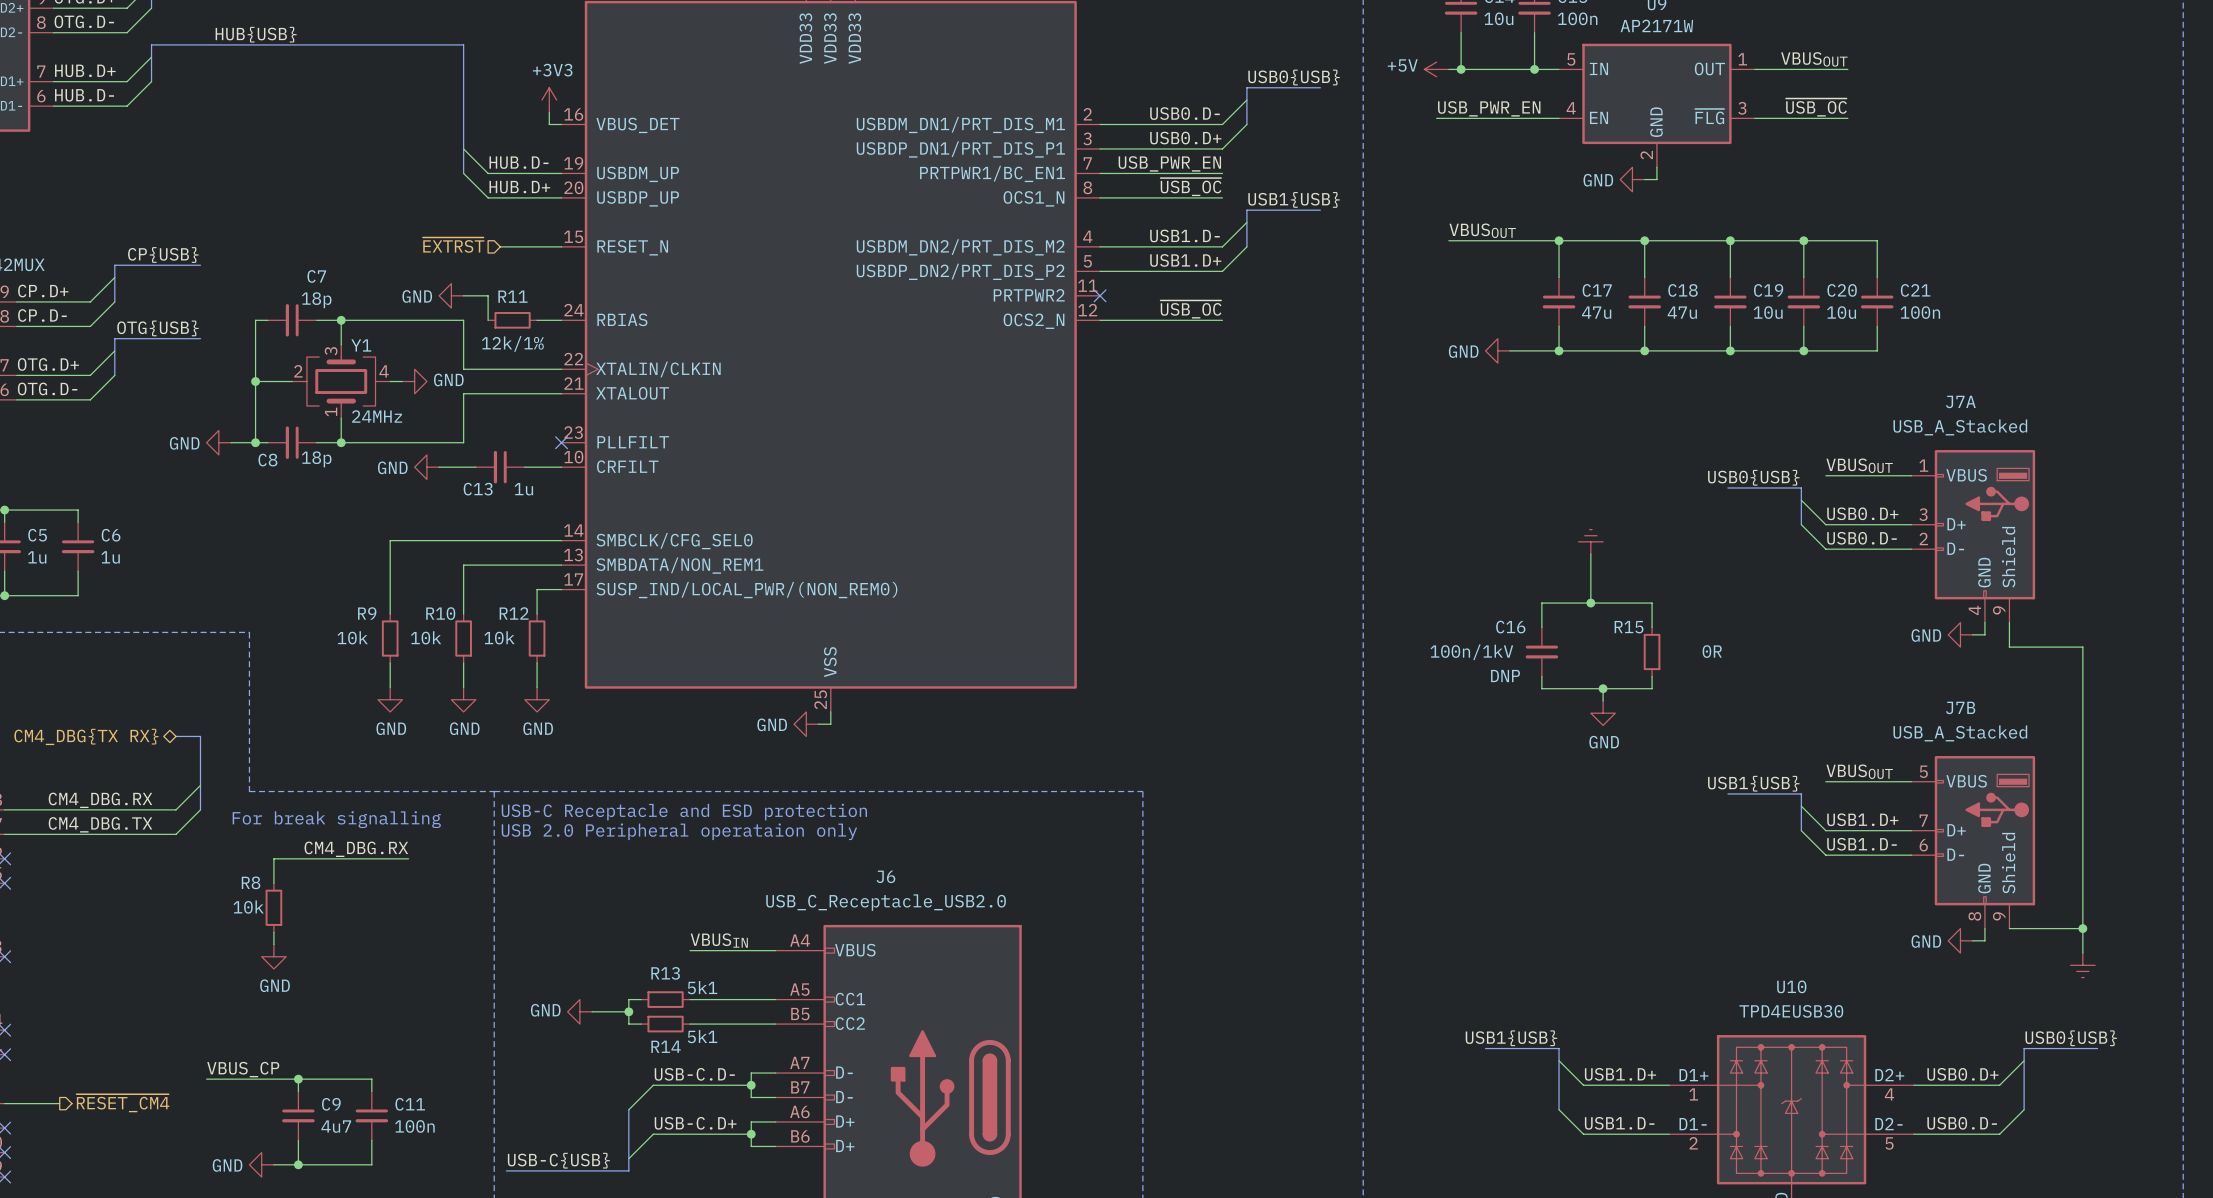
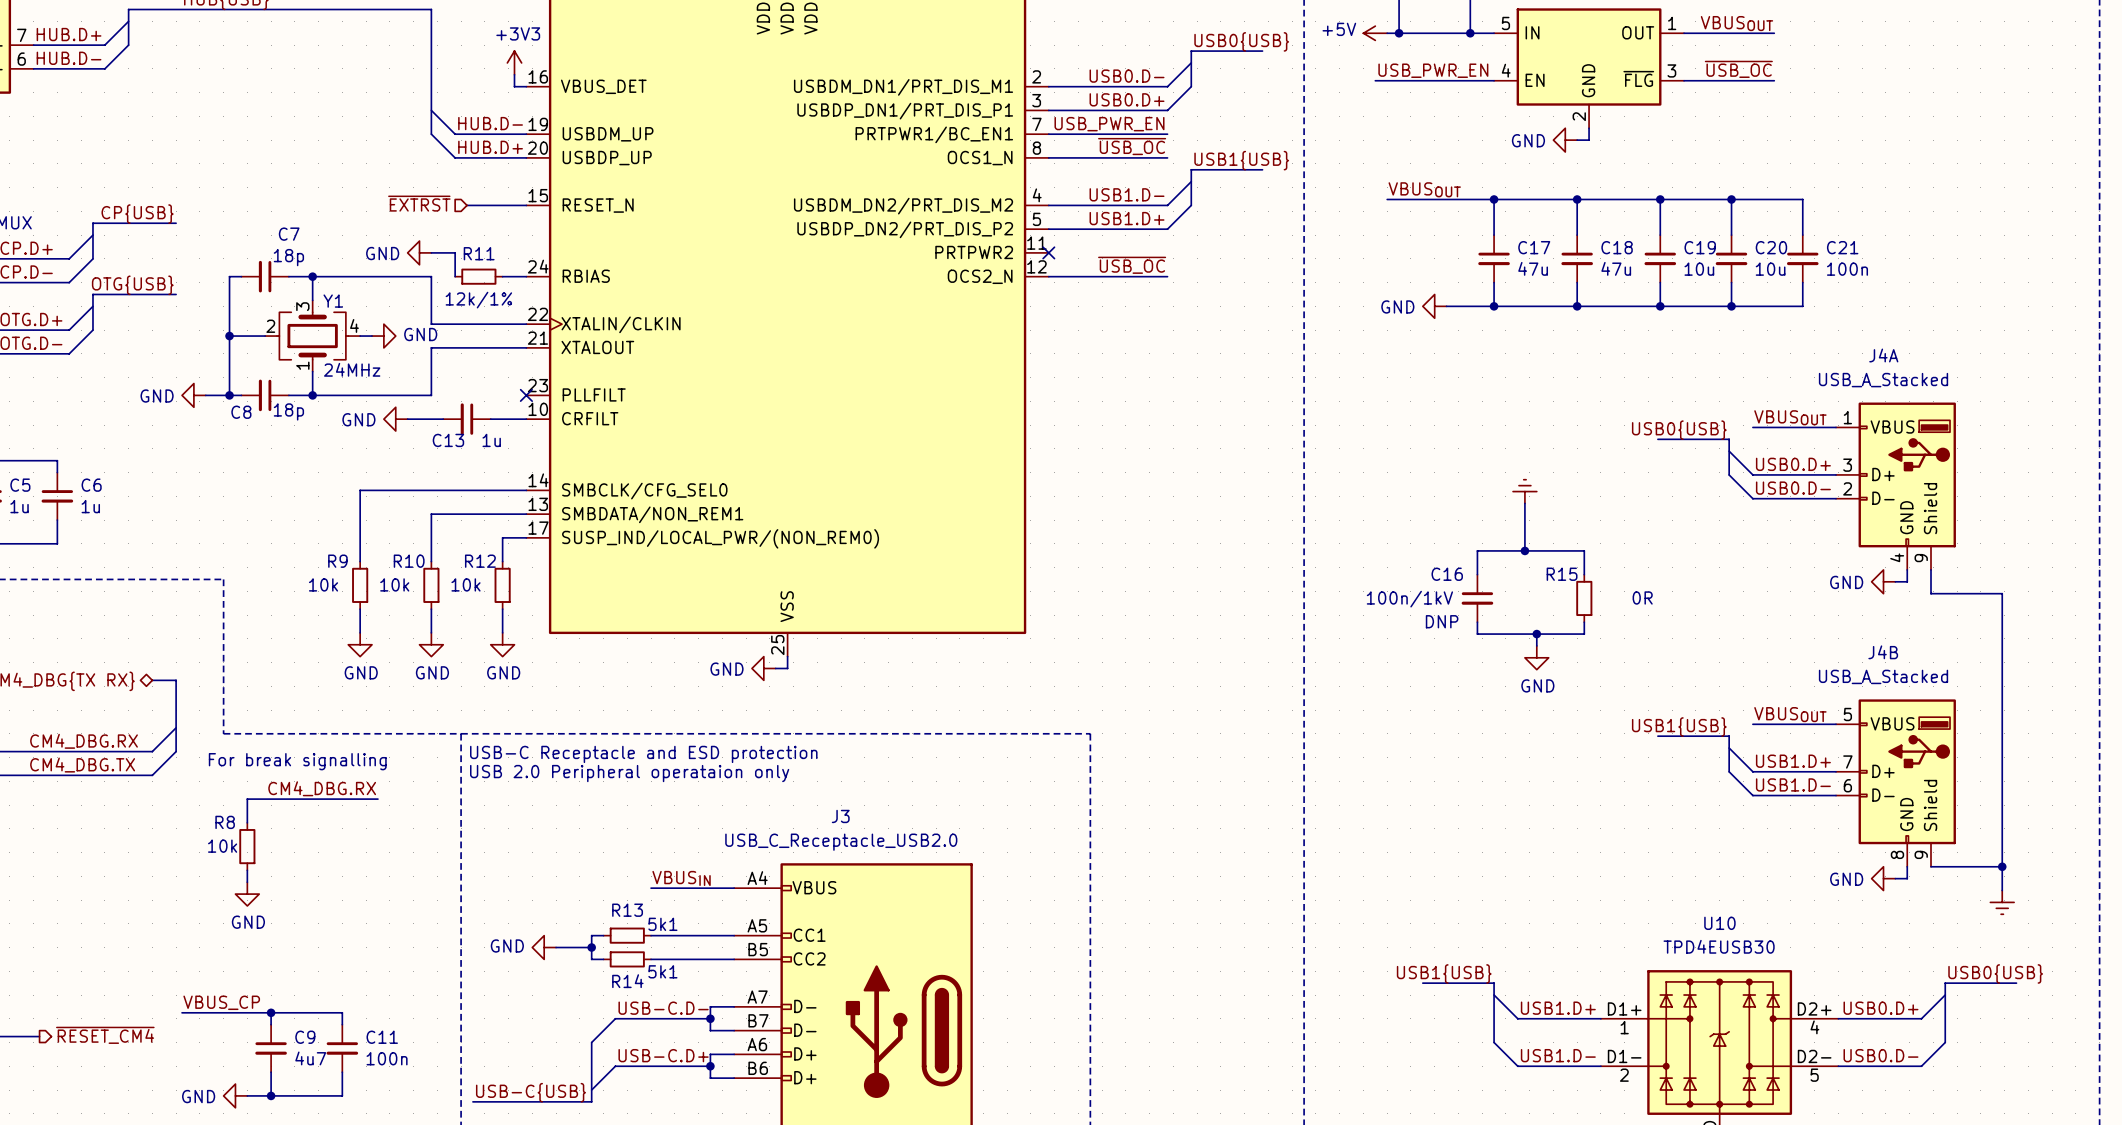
J7A name: J7A (1960, 401) -> J4A (1883, 355)
J7B name: J7B (1960, 707) -> J4B (1883, 652)
J6 name: J6 (885, 876) -> J3 (840, 816)

